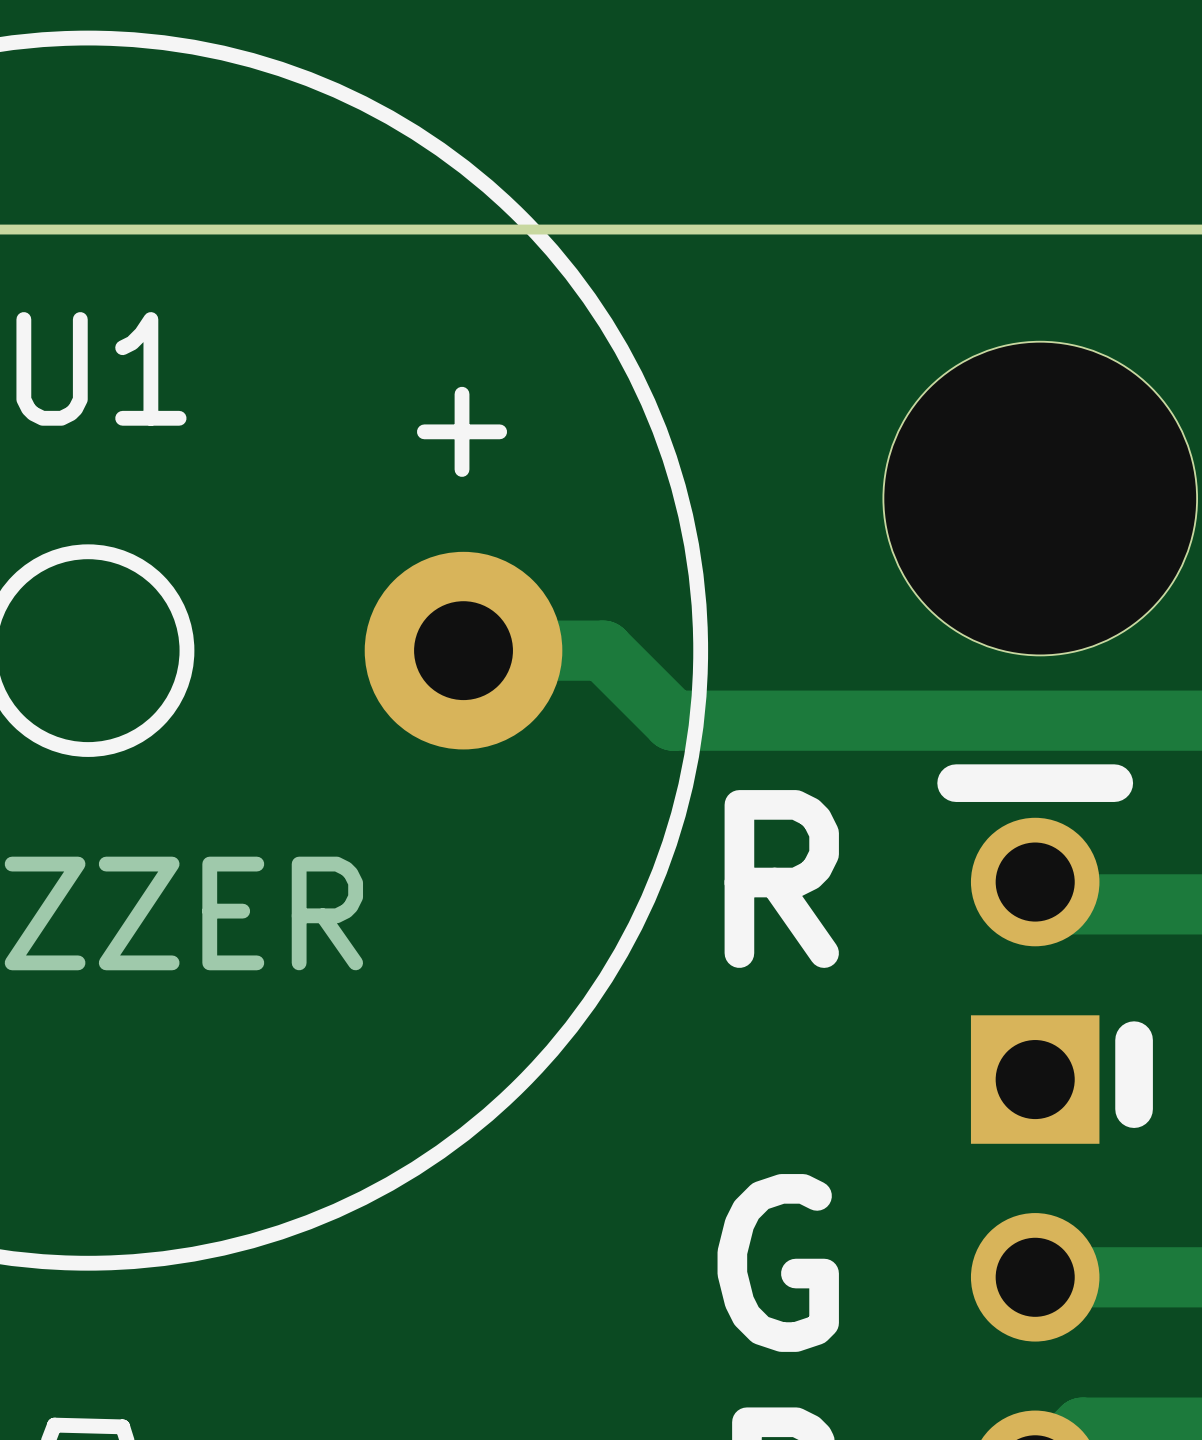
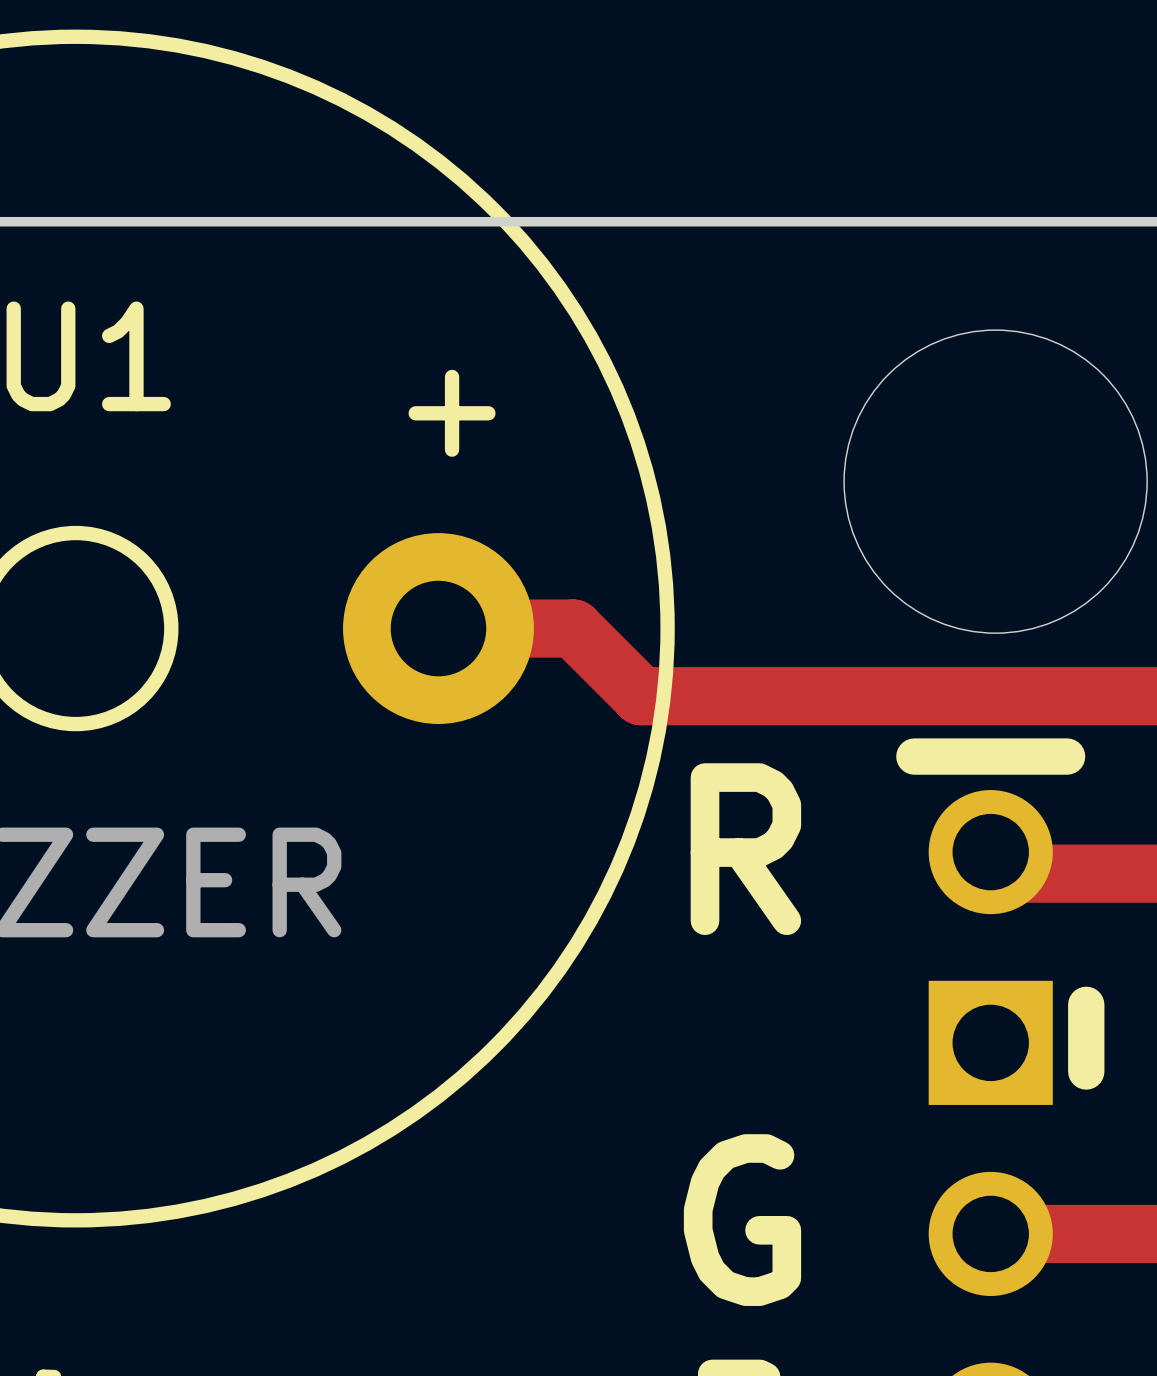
U1 text position: + (462, 431) -> + (452, 413)

